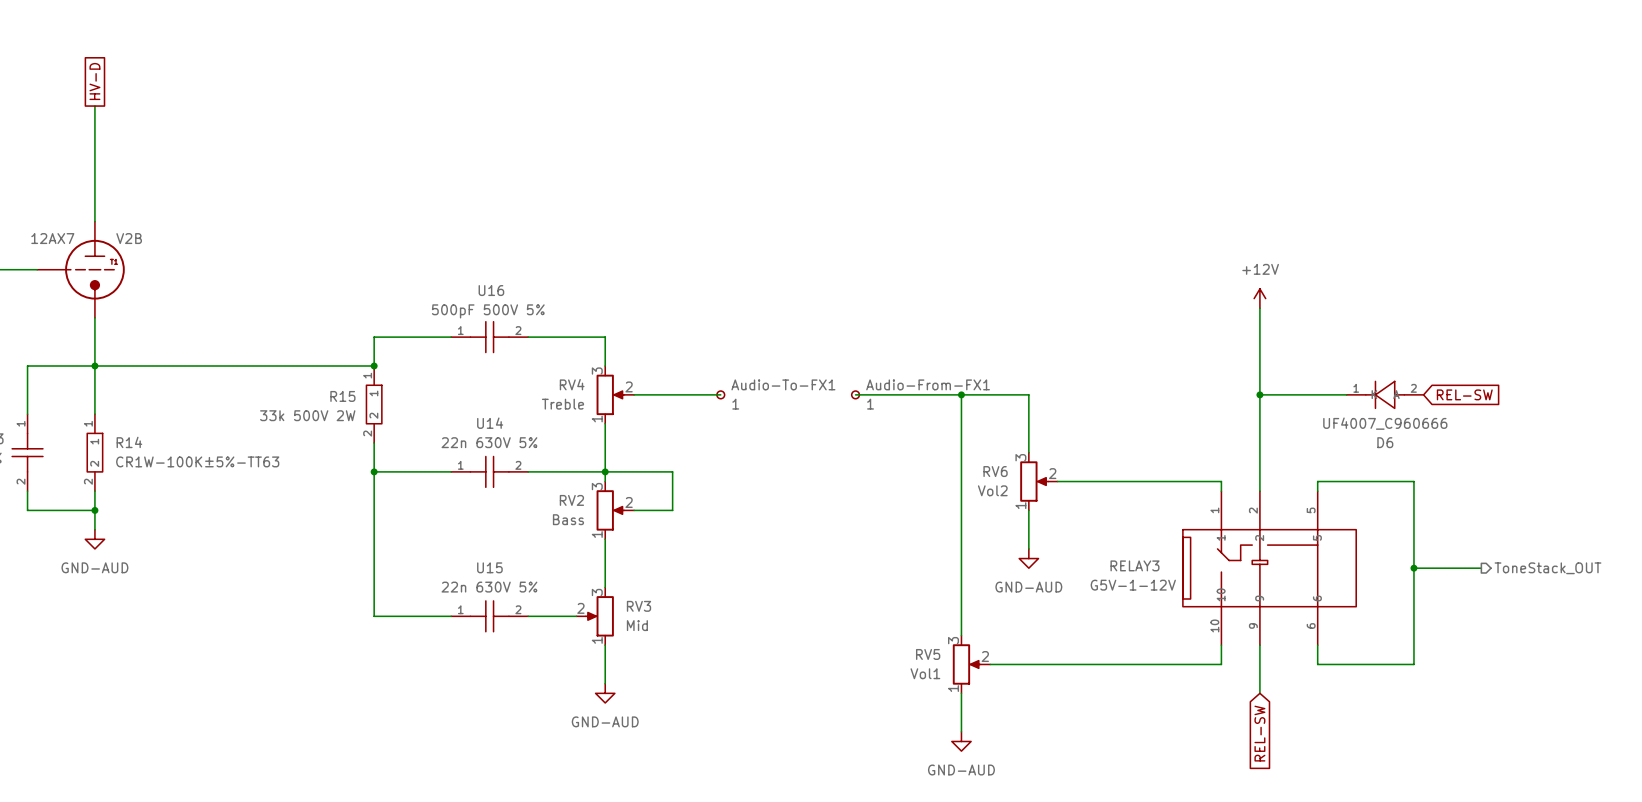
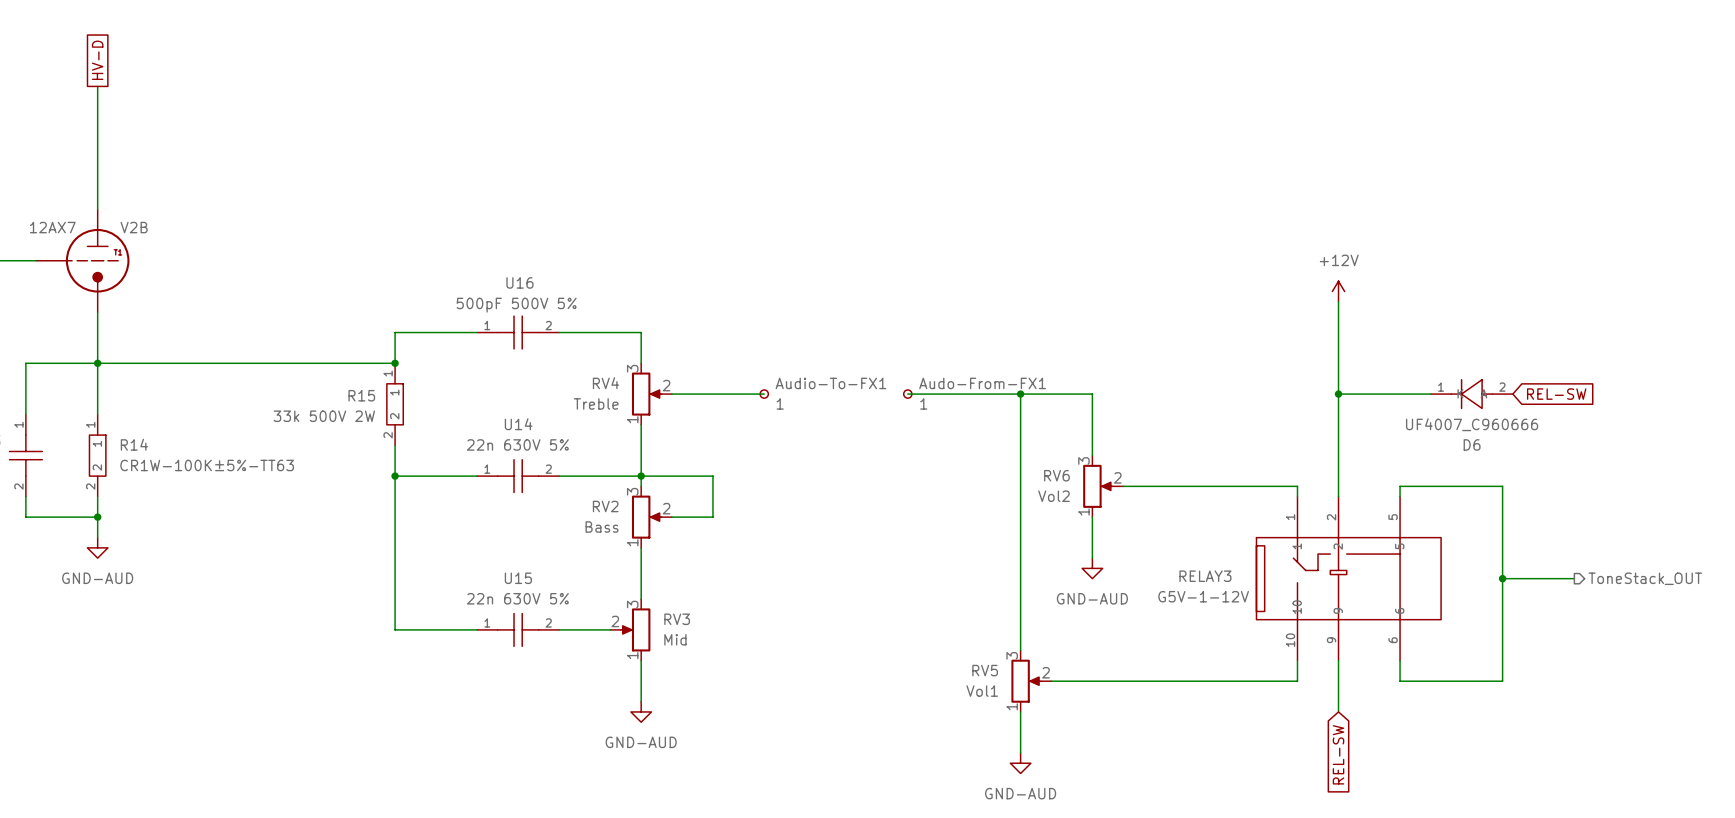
Audio-From-FX1 name: Audio-From-FX1 (928, 384) -> Audo-From-FX1 (982, 383)

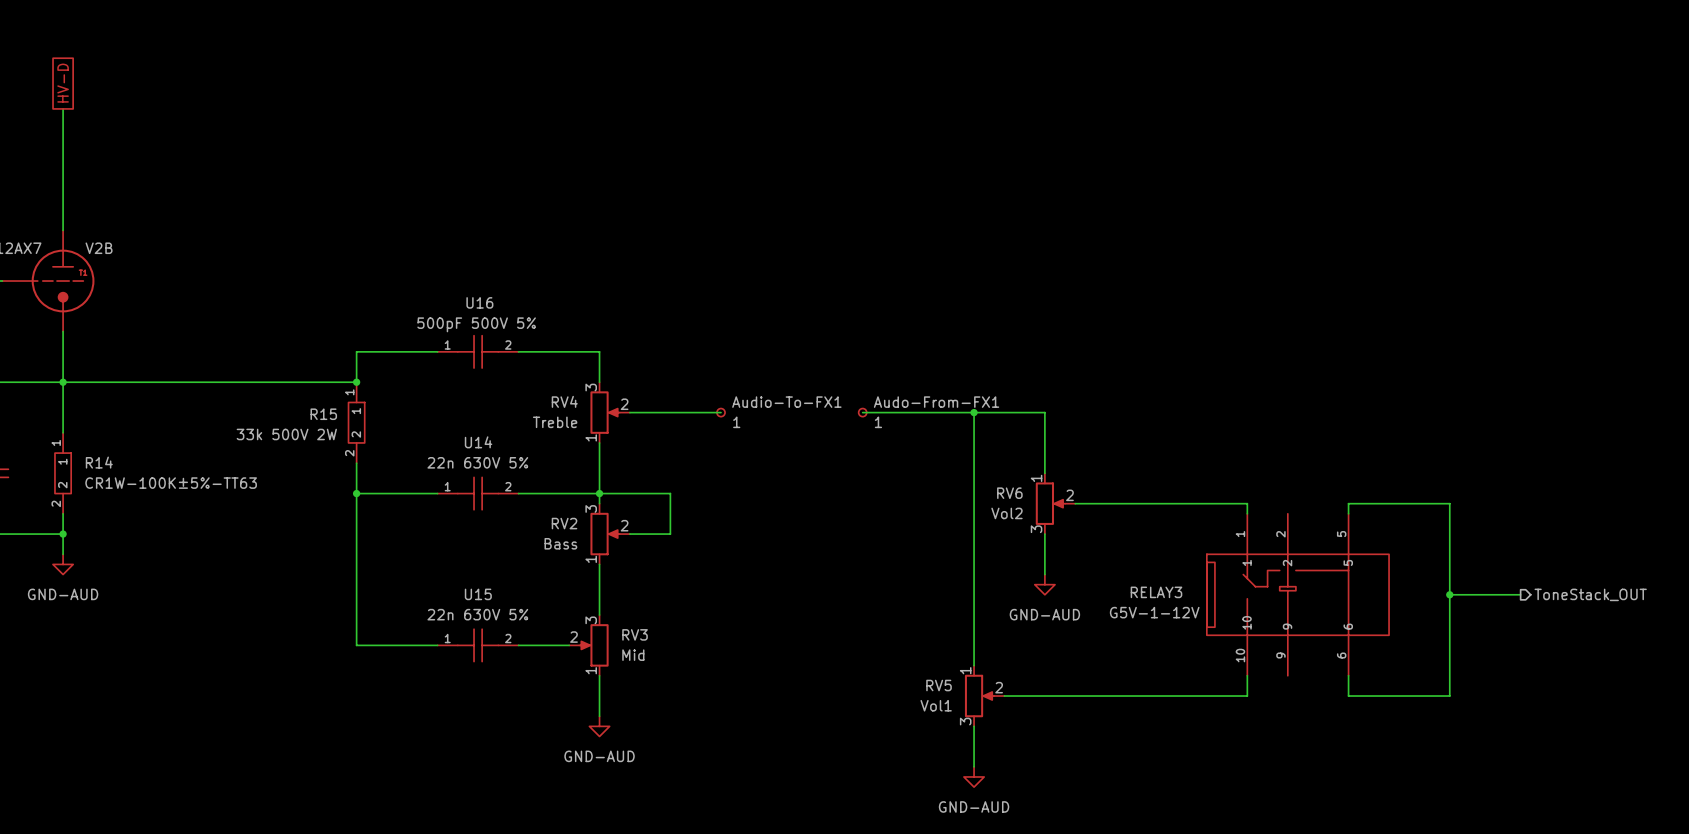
power symbol: +12V (1338, 291) -> none
wire: (1338, 301) (1338, 496) -> none
wire: (1338, 394) (1430, 394) -> none
junction: (1338, 394) -> none
D6: UF4007_C960666 (1471, 394) -> none
global label: REL-SW (1556, 394) -> none
RV6 flip: as is (1098, 486) -> up-down (1050, 503)
wire: (1338, 660) (1338, 711) -> none
RV5 flip: as is (1026, 681) -> up-down (979, 696)
global label: REL-SW (1338, 754) -> none

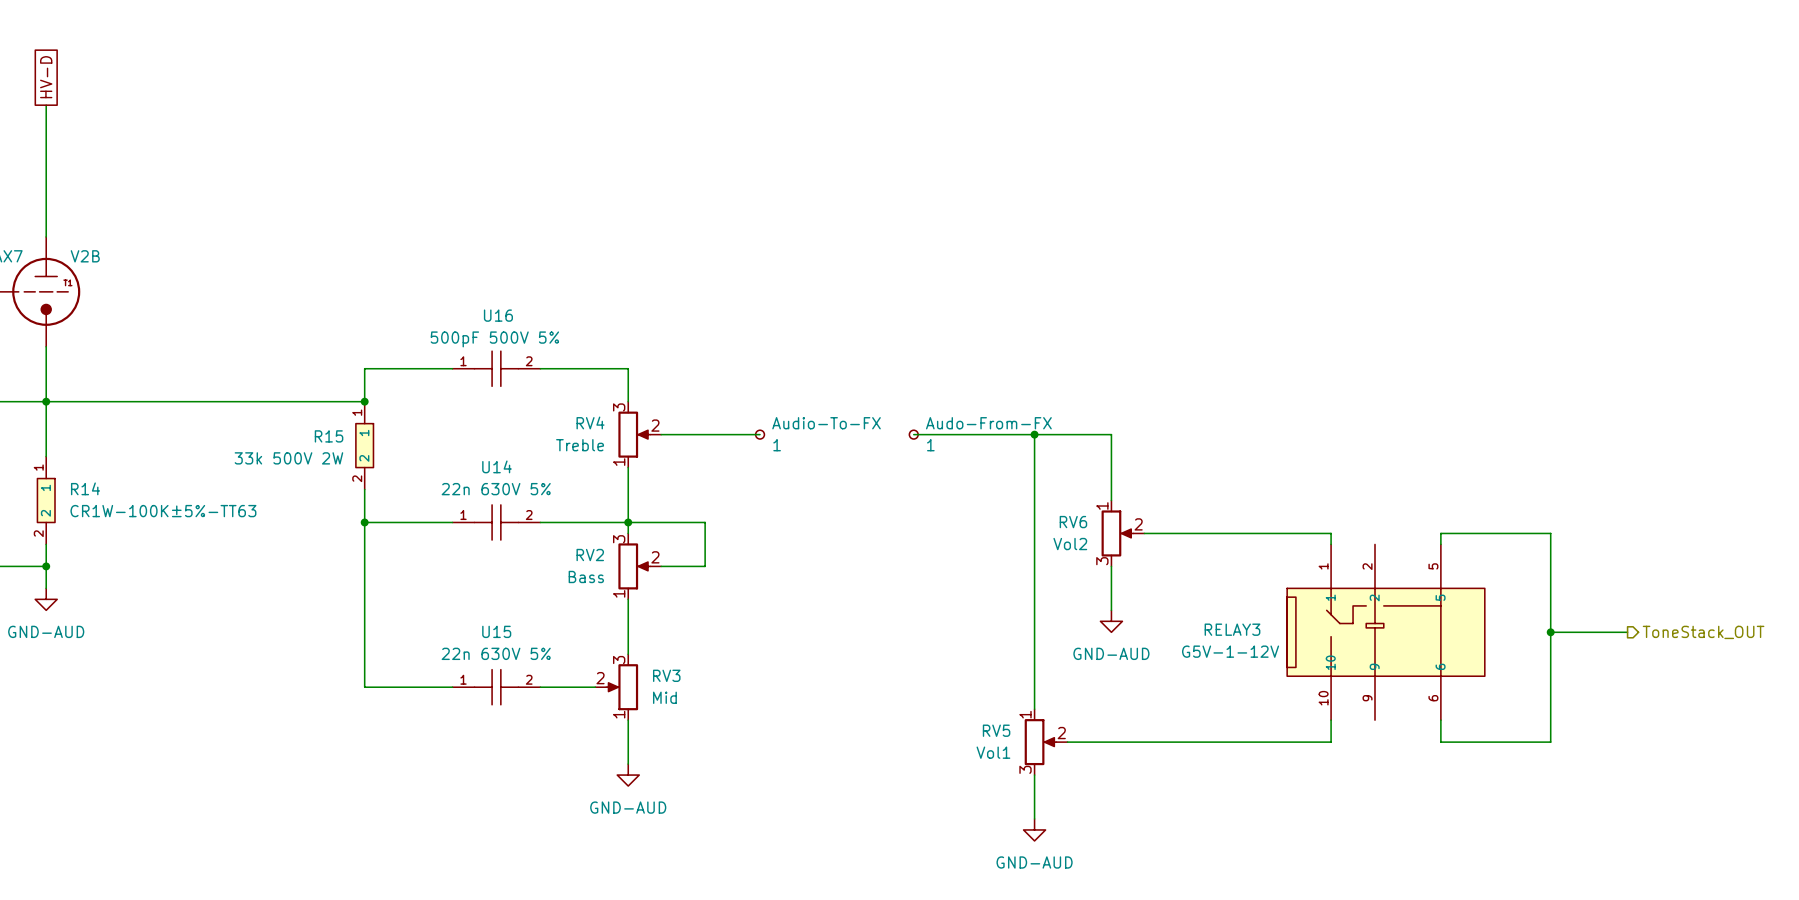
Audio-To-FX1 name: Audio-To-FX1 (786, 402) -> Audio-To-FX (826, 423)
Audo-From-FX1 name: Audo-From-FX1 (936, 402) -> Audo-From-FX (988, 423)

